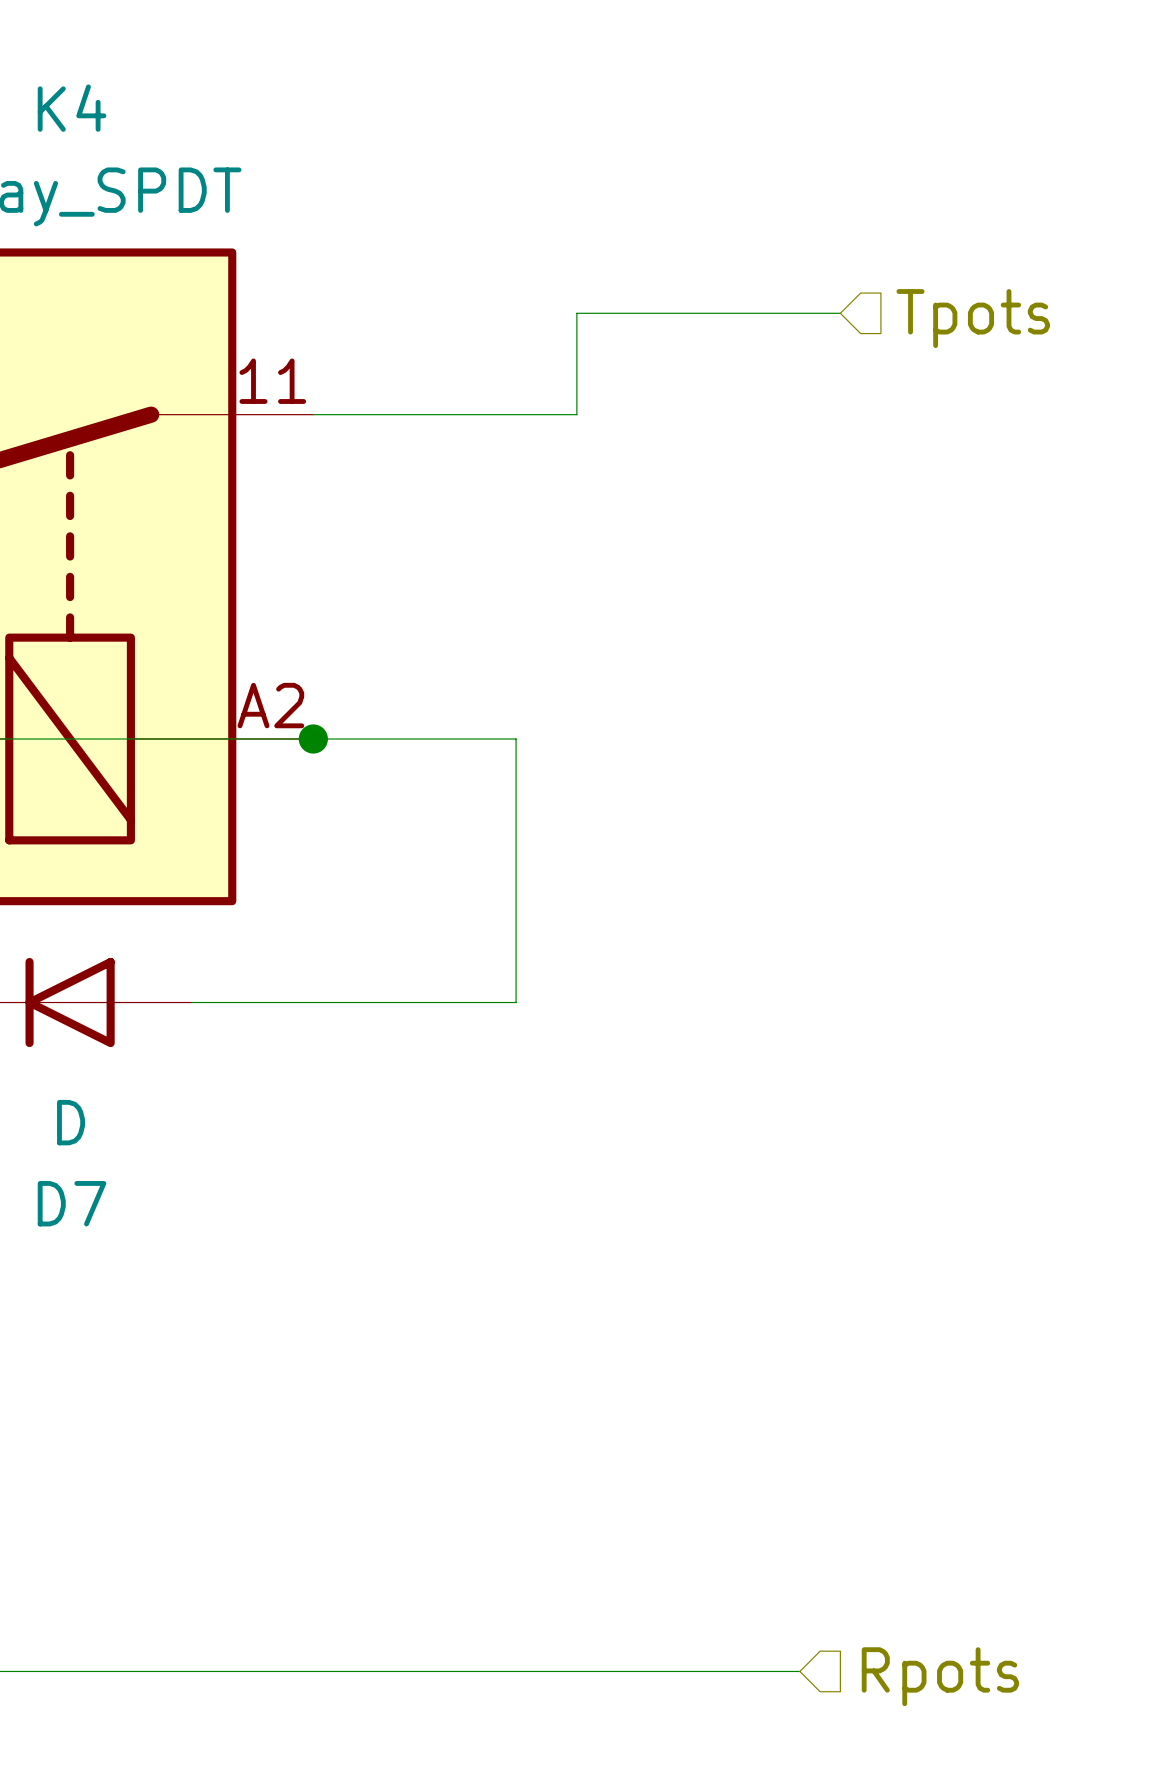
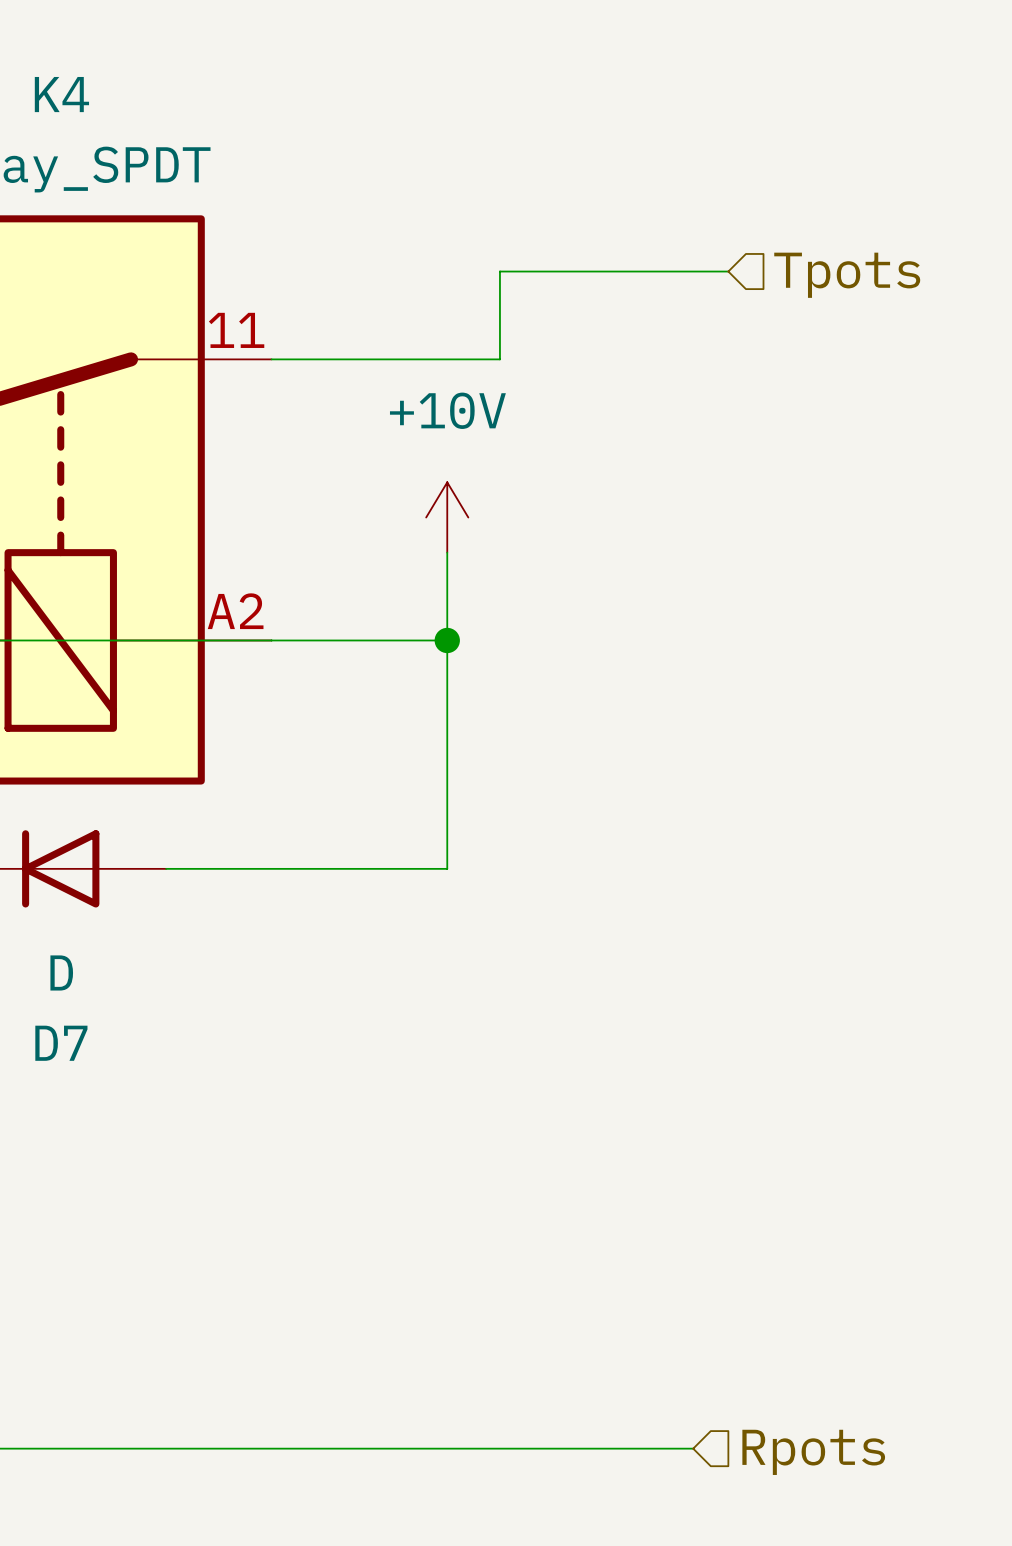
power symbol: none -> +10V (447, 517)
wire: none -> (447, 552) (447, 640)
junction: (313, 738) -> none
junction: none -> (447, 640)

